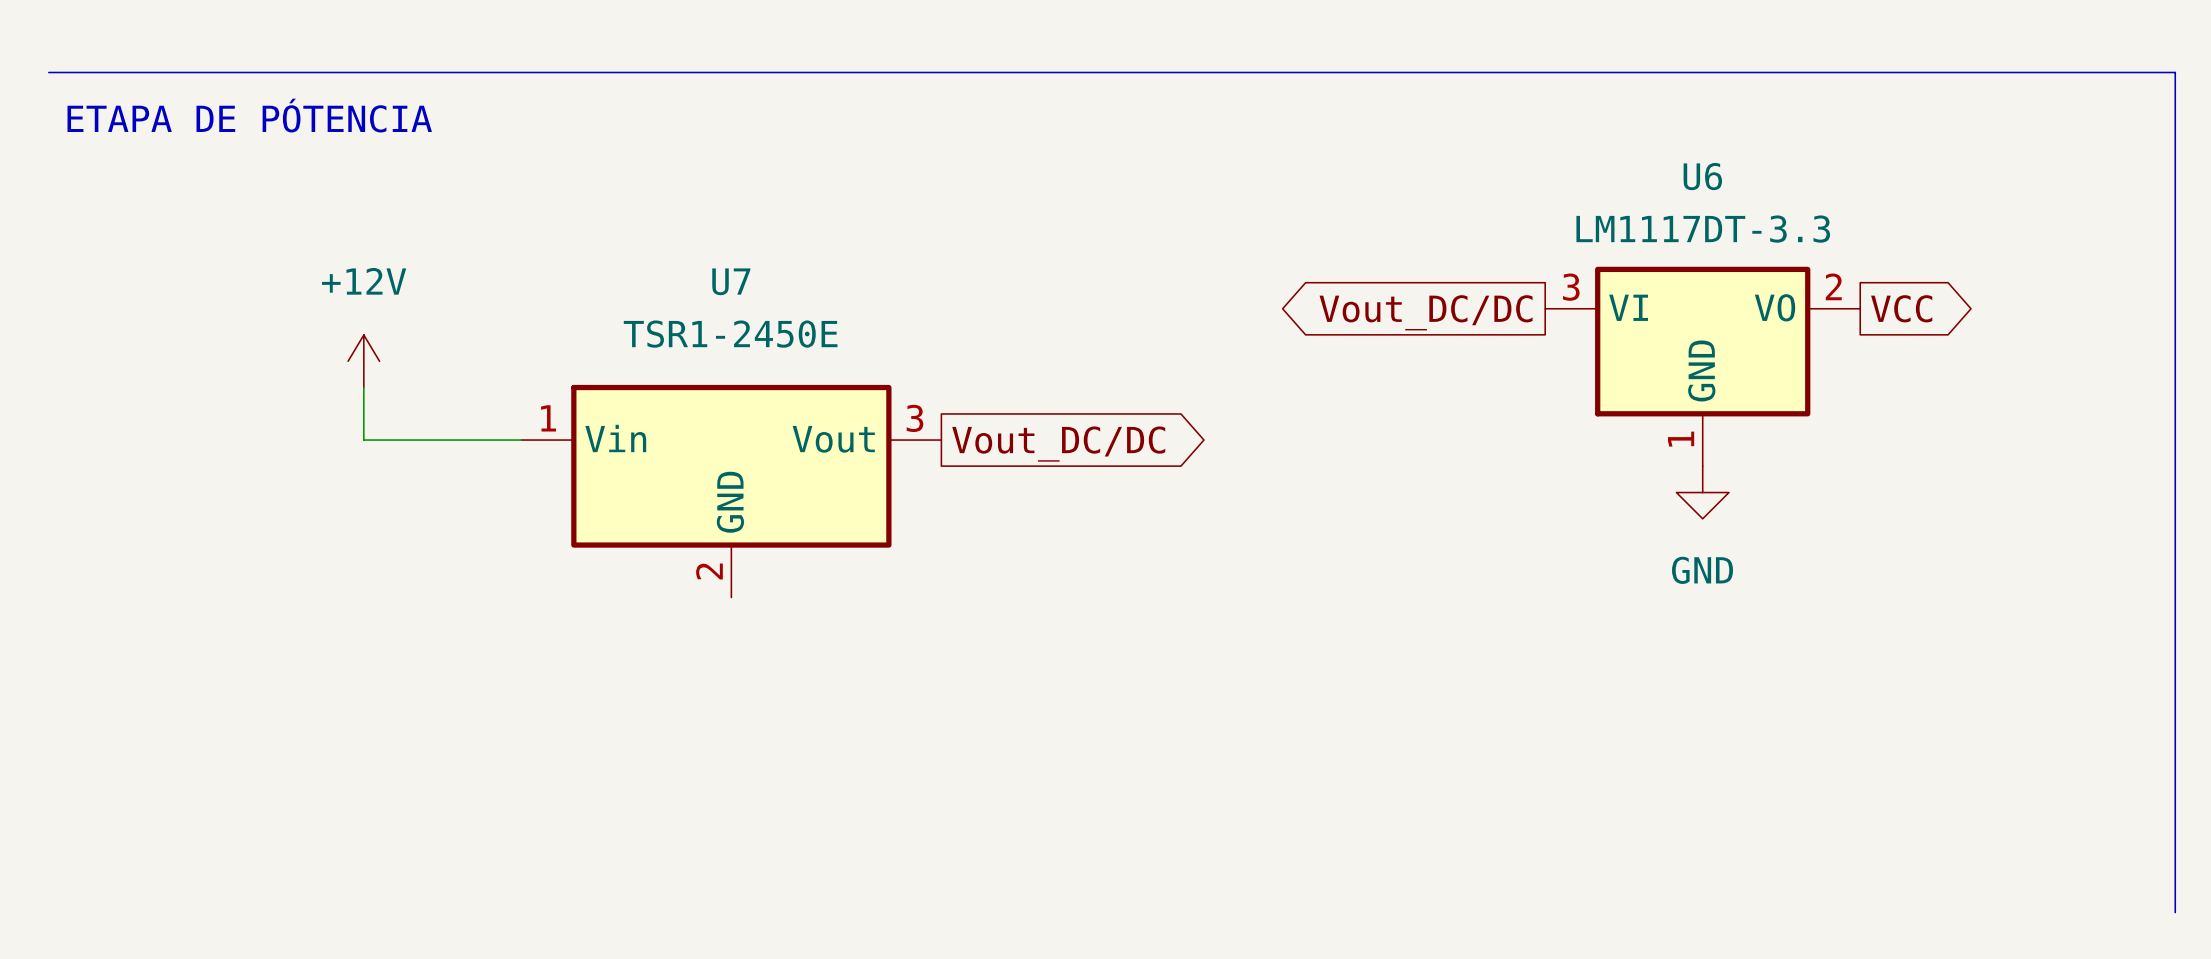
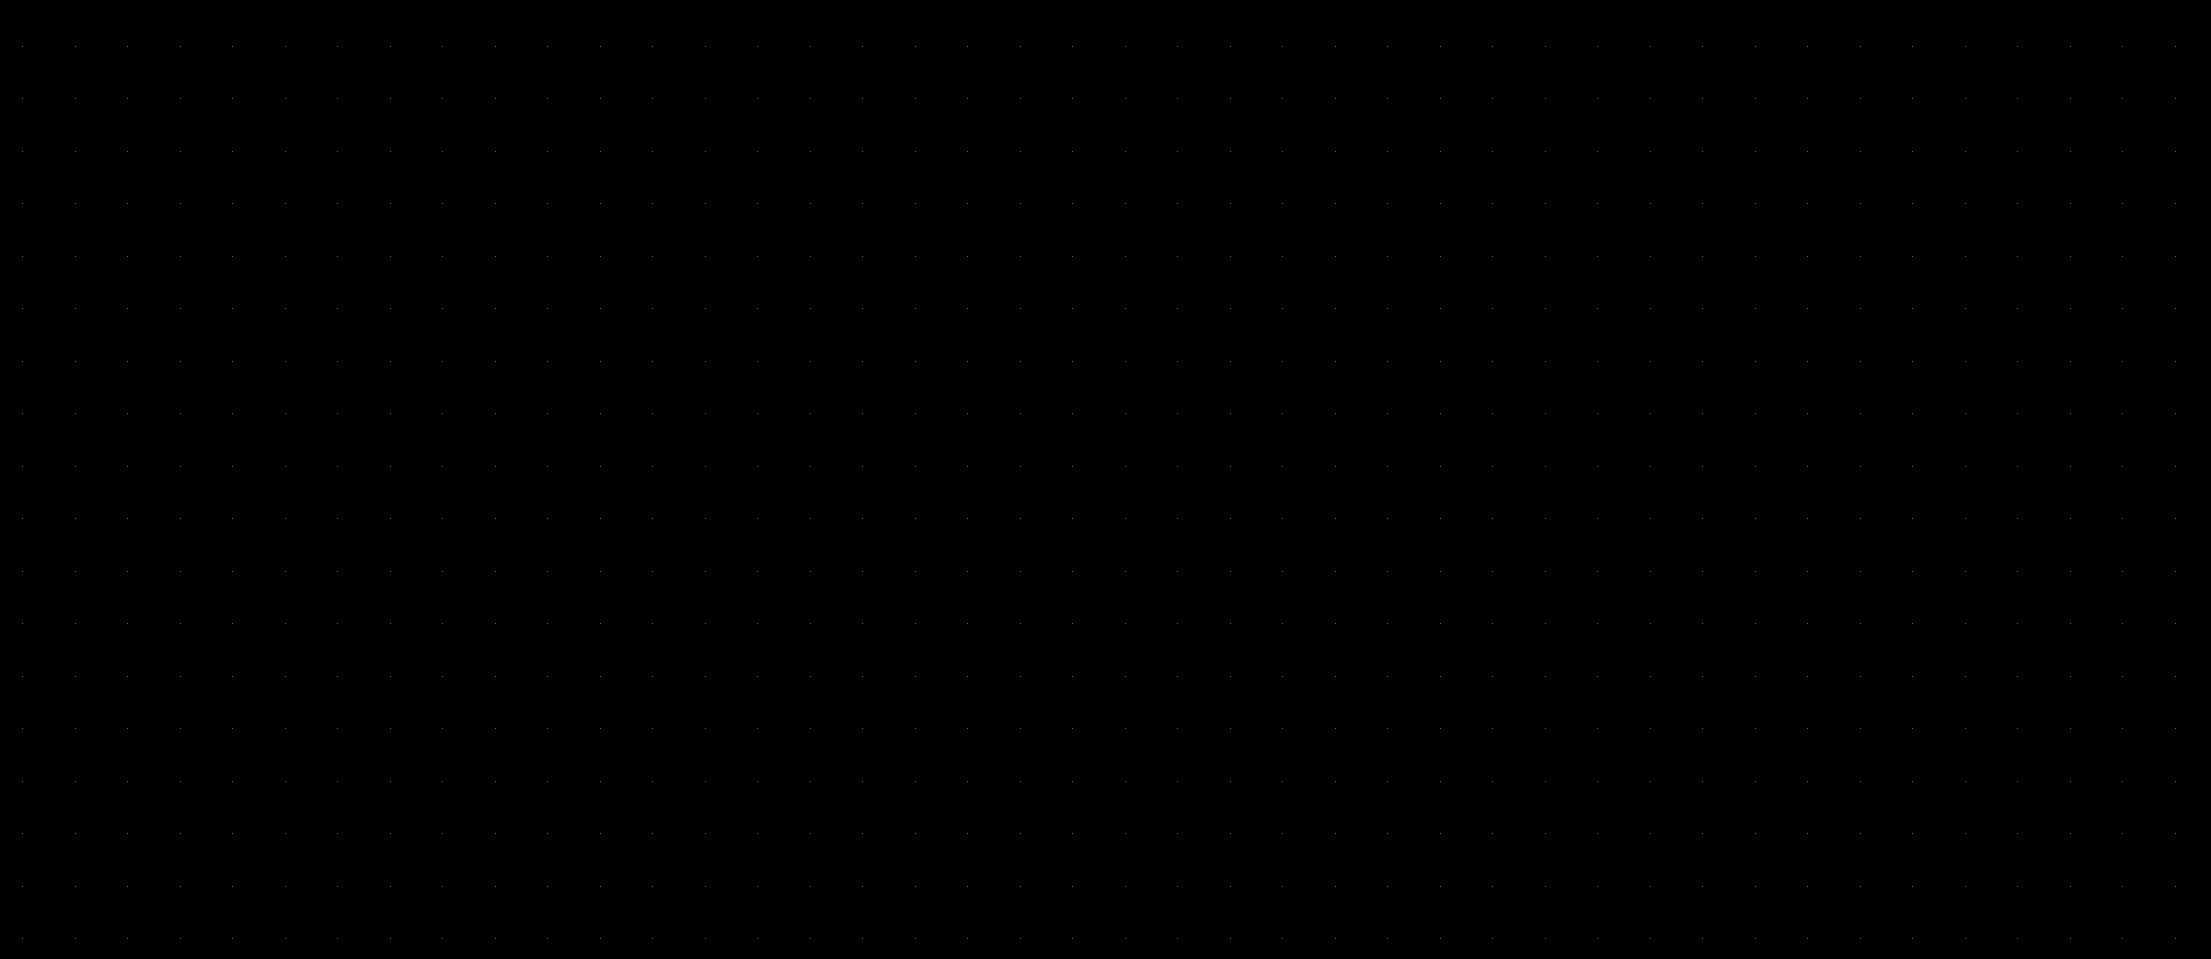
line: (48, 72) (2175, 72) (2175, 912) -> none
text: ETAPA DE PÓTENCIA (249, 115) -> none
global label: VCC (1901, 308) -> none
global label: Vout_DC/DC (1426, 312) -> none
power symbol: +12V (363, 361) -> none
U6: LM1117DT-3.3 (1702, 366) -> none
wire: (363, 387) (363, 440) (521, 440) -> none
global label: Vout_DC/DC (1058, 444) -> none
U7: TSR1-2450E (731, 491) -> none
power symbol: GND (1702, 492) -> none

